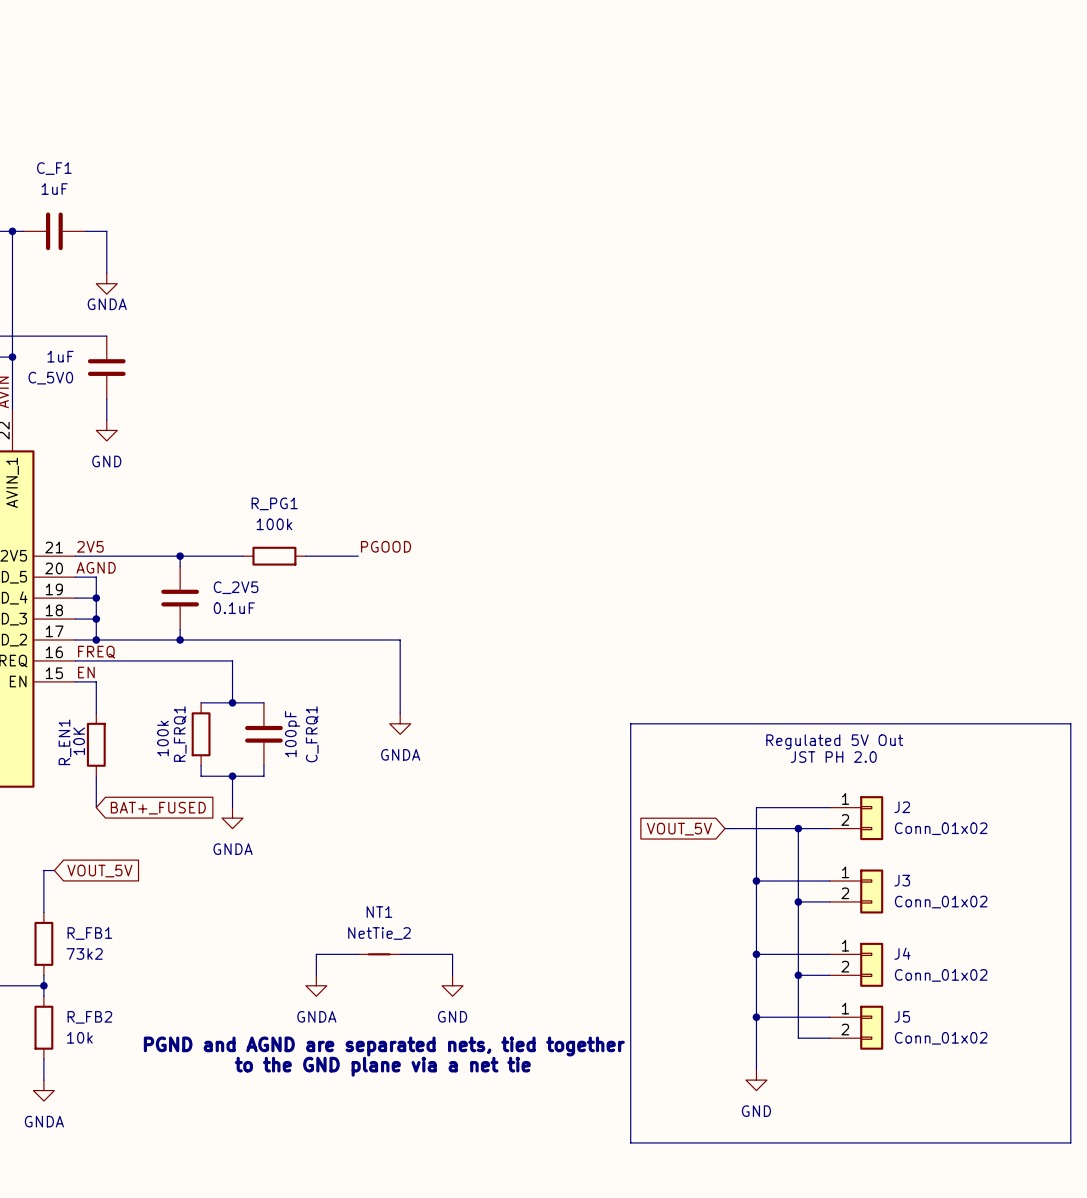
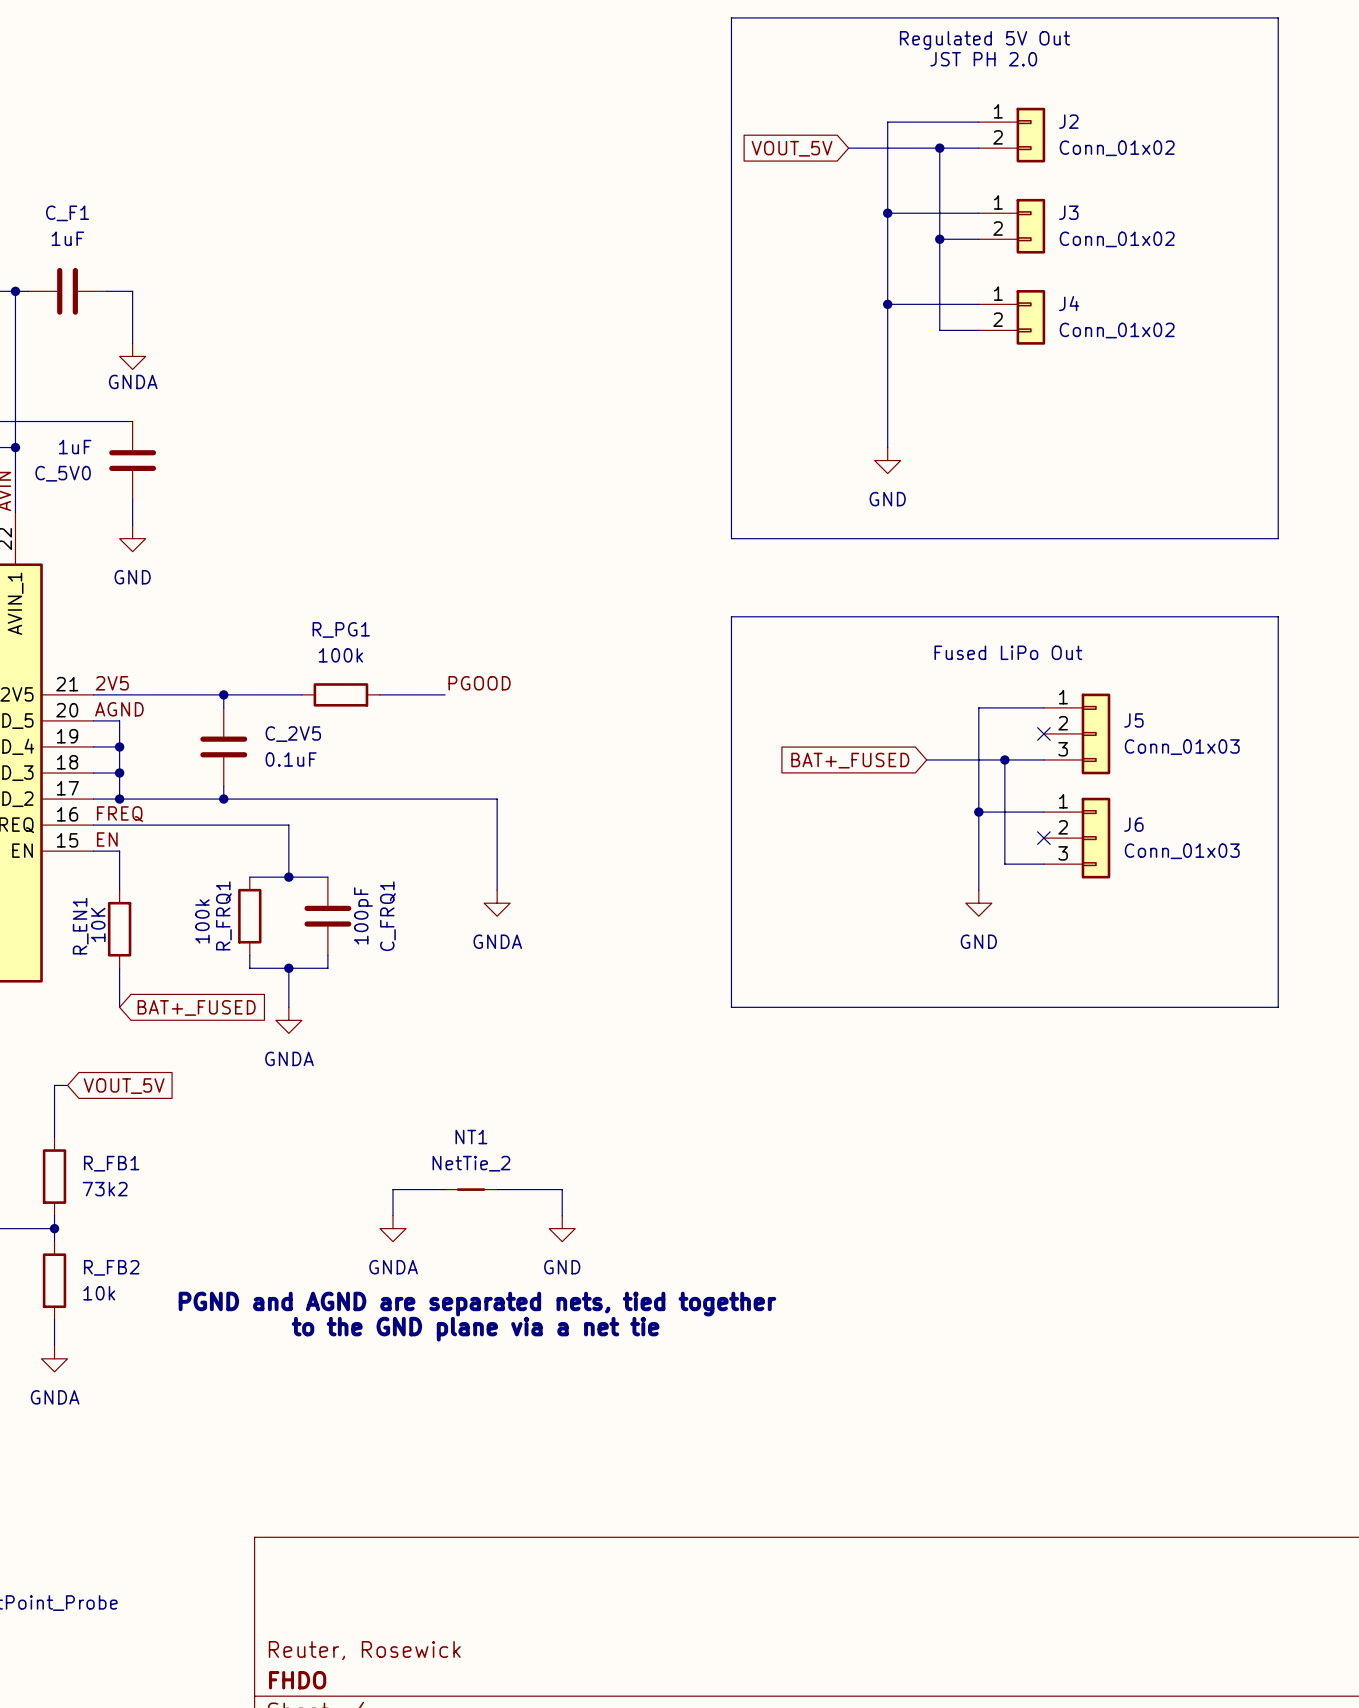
line: none -> (731, 17) (731, 538) (1278, 538) (1278, 17) (731, 17)
text: none -> Regulated 5V Out (984, 40)
text: none -> JST PH 2.0 (983, 59)
wire: none -> (978, 122) (887, 122) (887, 447)
global label: none -> VOUT_5V (792, 148)
wire: none -> (848, 148) (978, 148)
wire: none -> (939, 148) (939, 330) (978, 330)
junction: none -> (939, 148)
wire: none -> (887, 213) (978, 213)
junction: none -> (887, 213)
wire: none -> (939, 239) (978, 239)
junction: none -> (939, 239)
wire: none -> (887, 304) (978, 304)
junction: none -> (887, 304)
power symbol: none -> GND (887, 460)
line: none -> (731, 616) (1278, 616) (1278, 1007) (731, 1007) (731, 616)
text: none -> Fused LiPo Out (1008, 652)
wire: none -> (1043, 707) (978, 707) (978, 890)
no-connect mark: none -> (1043, 733)
wire: none -> (926, 759) (1043, 759)
wire: none -> (1004, 759) (1004, 864) (1043, 864)
junction: none -> (1004, 759)
global label: none -> BAT+_FUSED (850, 760)
wire: none -> (978, 812) (1043, 812)
junction: none -> (978, 812)
no-connect mark: none -> (1043, 838)
J6: none -> Conn_01x03 (1077, 838)
line: (630, 723) (1070, 723) (1070, 1142) (630, 1142) (630, 723) -> none
power symbol: none -> GND (978, 903)
text: Regulated 5V Out (834, 741) -> none
text: JST PH 2.0 (833, 757) -> none
wire: (829, 807) (756, 807) (756, 1069) -> none
J2 position: (856, 818) -> (1012, 135)
wire: (725, 828) (829, 828) -> none
wire: (798, 828) (798, 1038) (829, 1038) -> none
junction: (798, 828) -> none
global label: VOUT_5V (679, 829) -> none
wire: (756, 881) (829, 881) -> none
junction: (756, 881) -> none
J3 position: (856, 891) -> (1012, 226)
wire: (798, 901) (829, 901) -> none
junction: (798, 901) -> none
wire: (756, 954) (829, 954) -> none
junction: (756, 954) -> none
J4 position: (856, 964) -> (1012, 317)
wire: (798, 975) (829, 975) -> none
junction: (798, 975) -> none
J5 symbol: [829, 1005, 884, 1050] -> [1043, 693, 1111, 775]
wire: (756, 1017) (829, 1017) -> none
junction: (756, 1017) -> none
J5 value: Conn_01x02 (941, 1038) -> Conn_01x03 (1182, 747)
power symbol: GND (756, 1080) -> none

